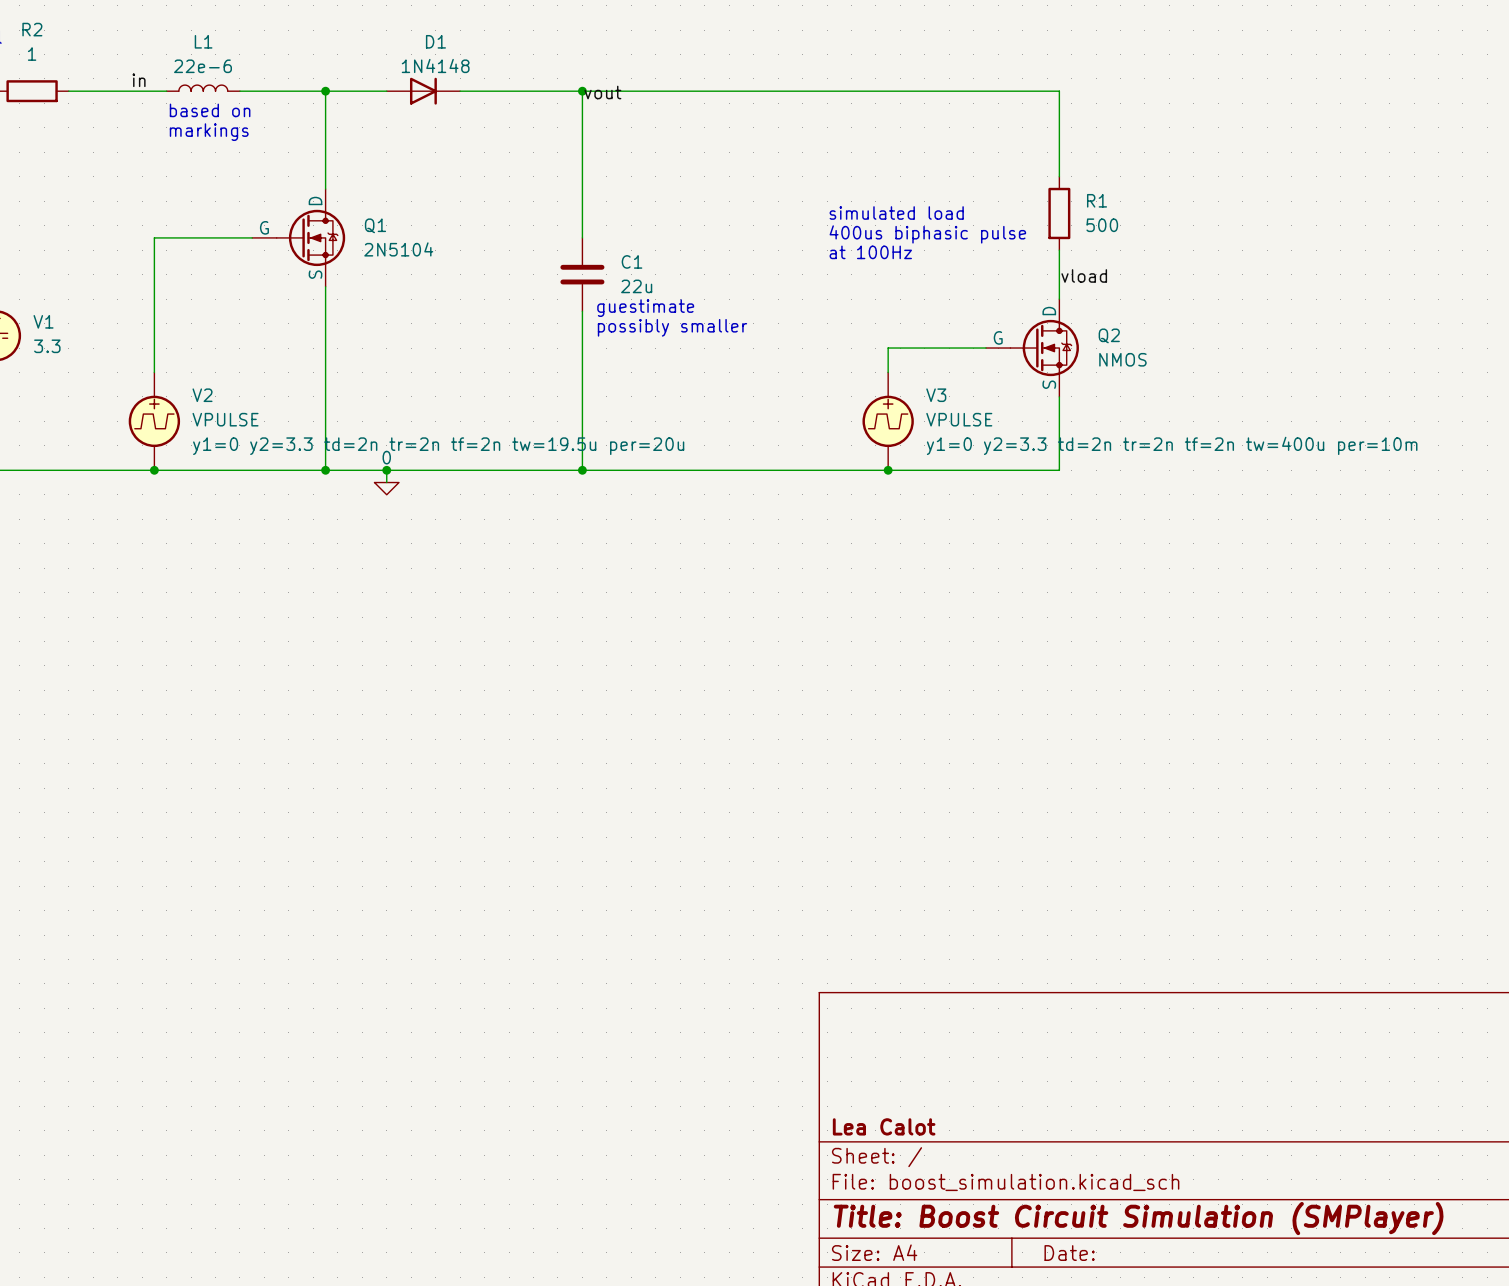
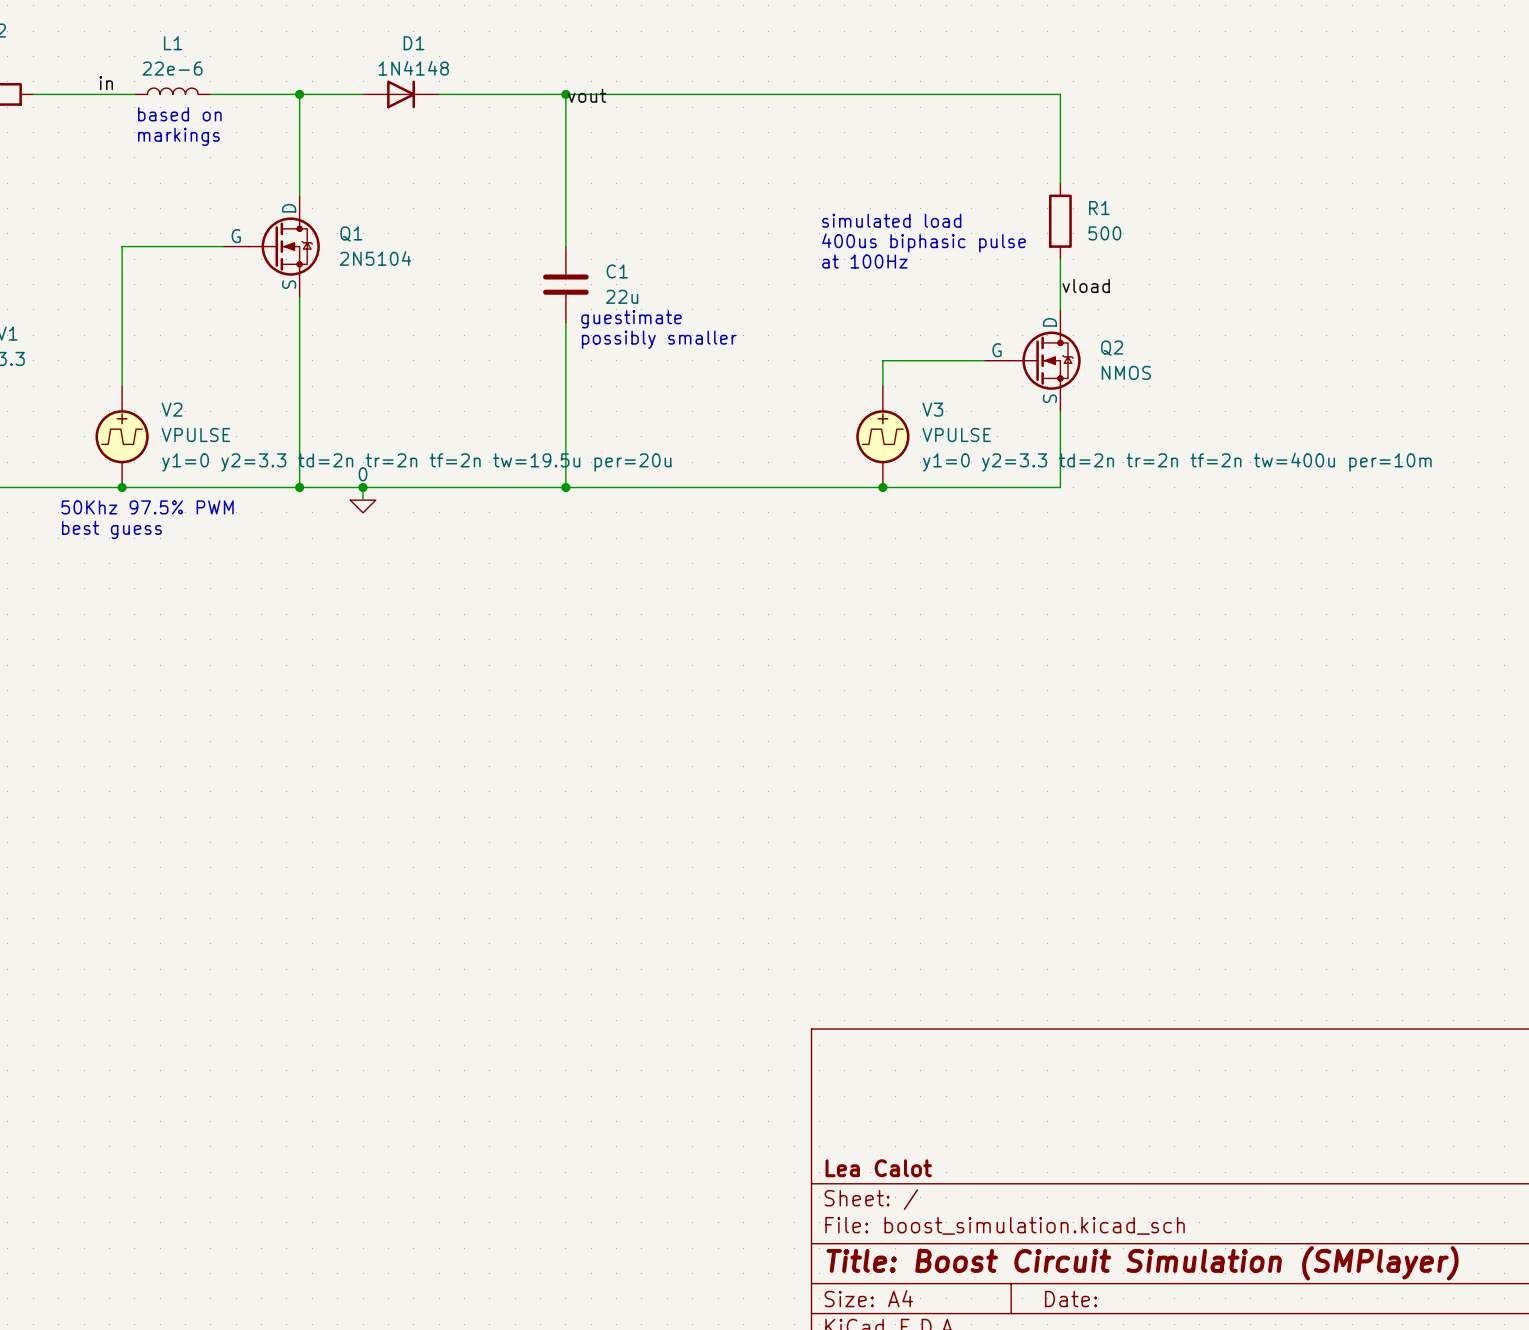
text: none -> 50Khz 97.5% PWM (147, 507)
text: none -> best guess (111, 529)

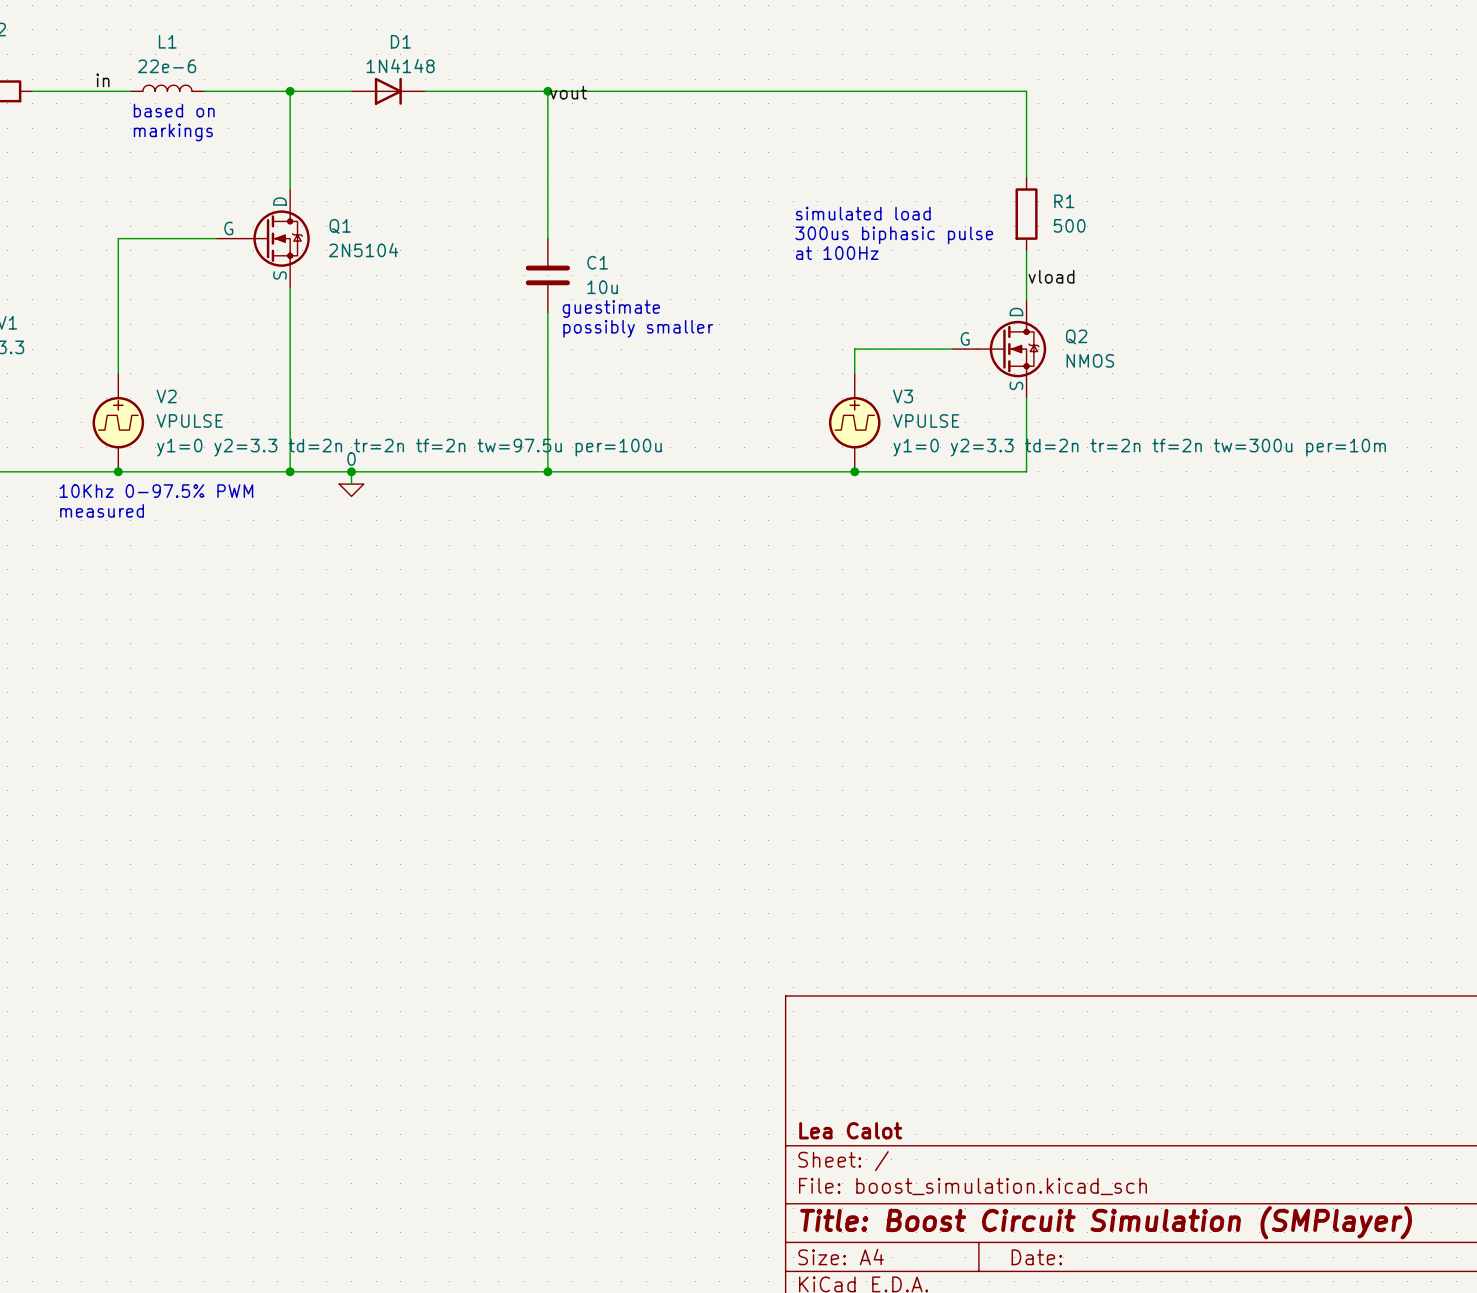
text: 400us biphasic pulse (924, 242) -> 300us biphasic pulse (894, 235)
C1 value: 22u (622, 296) -> 10u (602, 287)
V2 text: y1=0 y2=3.3 td=2n tr=2n tf=2n tw=19.5u per=20u (416, 462) -> y1=0 y2=3.3 td=2n tr=2n tf=2n tw=97.5u per=100u (409, 447)
V3 text: y1=0 y2=3.3 td=2n tr=2n tf=2n tw=400u per=10m (1177, 462) -> y1=0 y2=3.3 td=2n tr=2n tf=2n tw=300u per=10m (1139, 447)
text: 50Khz 97.5% PWM (147, 507) -> 10Khz 0-97.5% PWM (156, 491)
text: best guess (111, 529) -> measured (102, 510)

